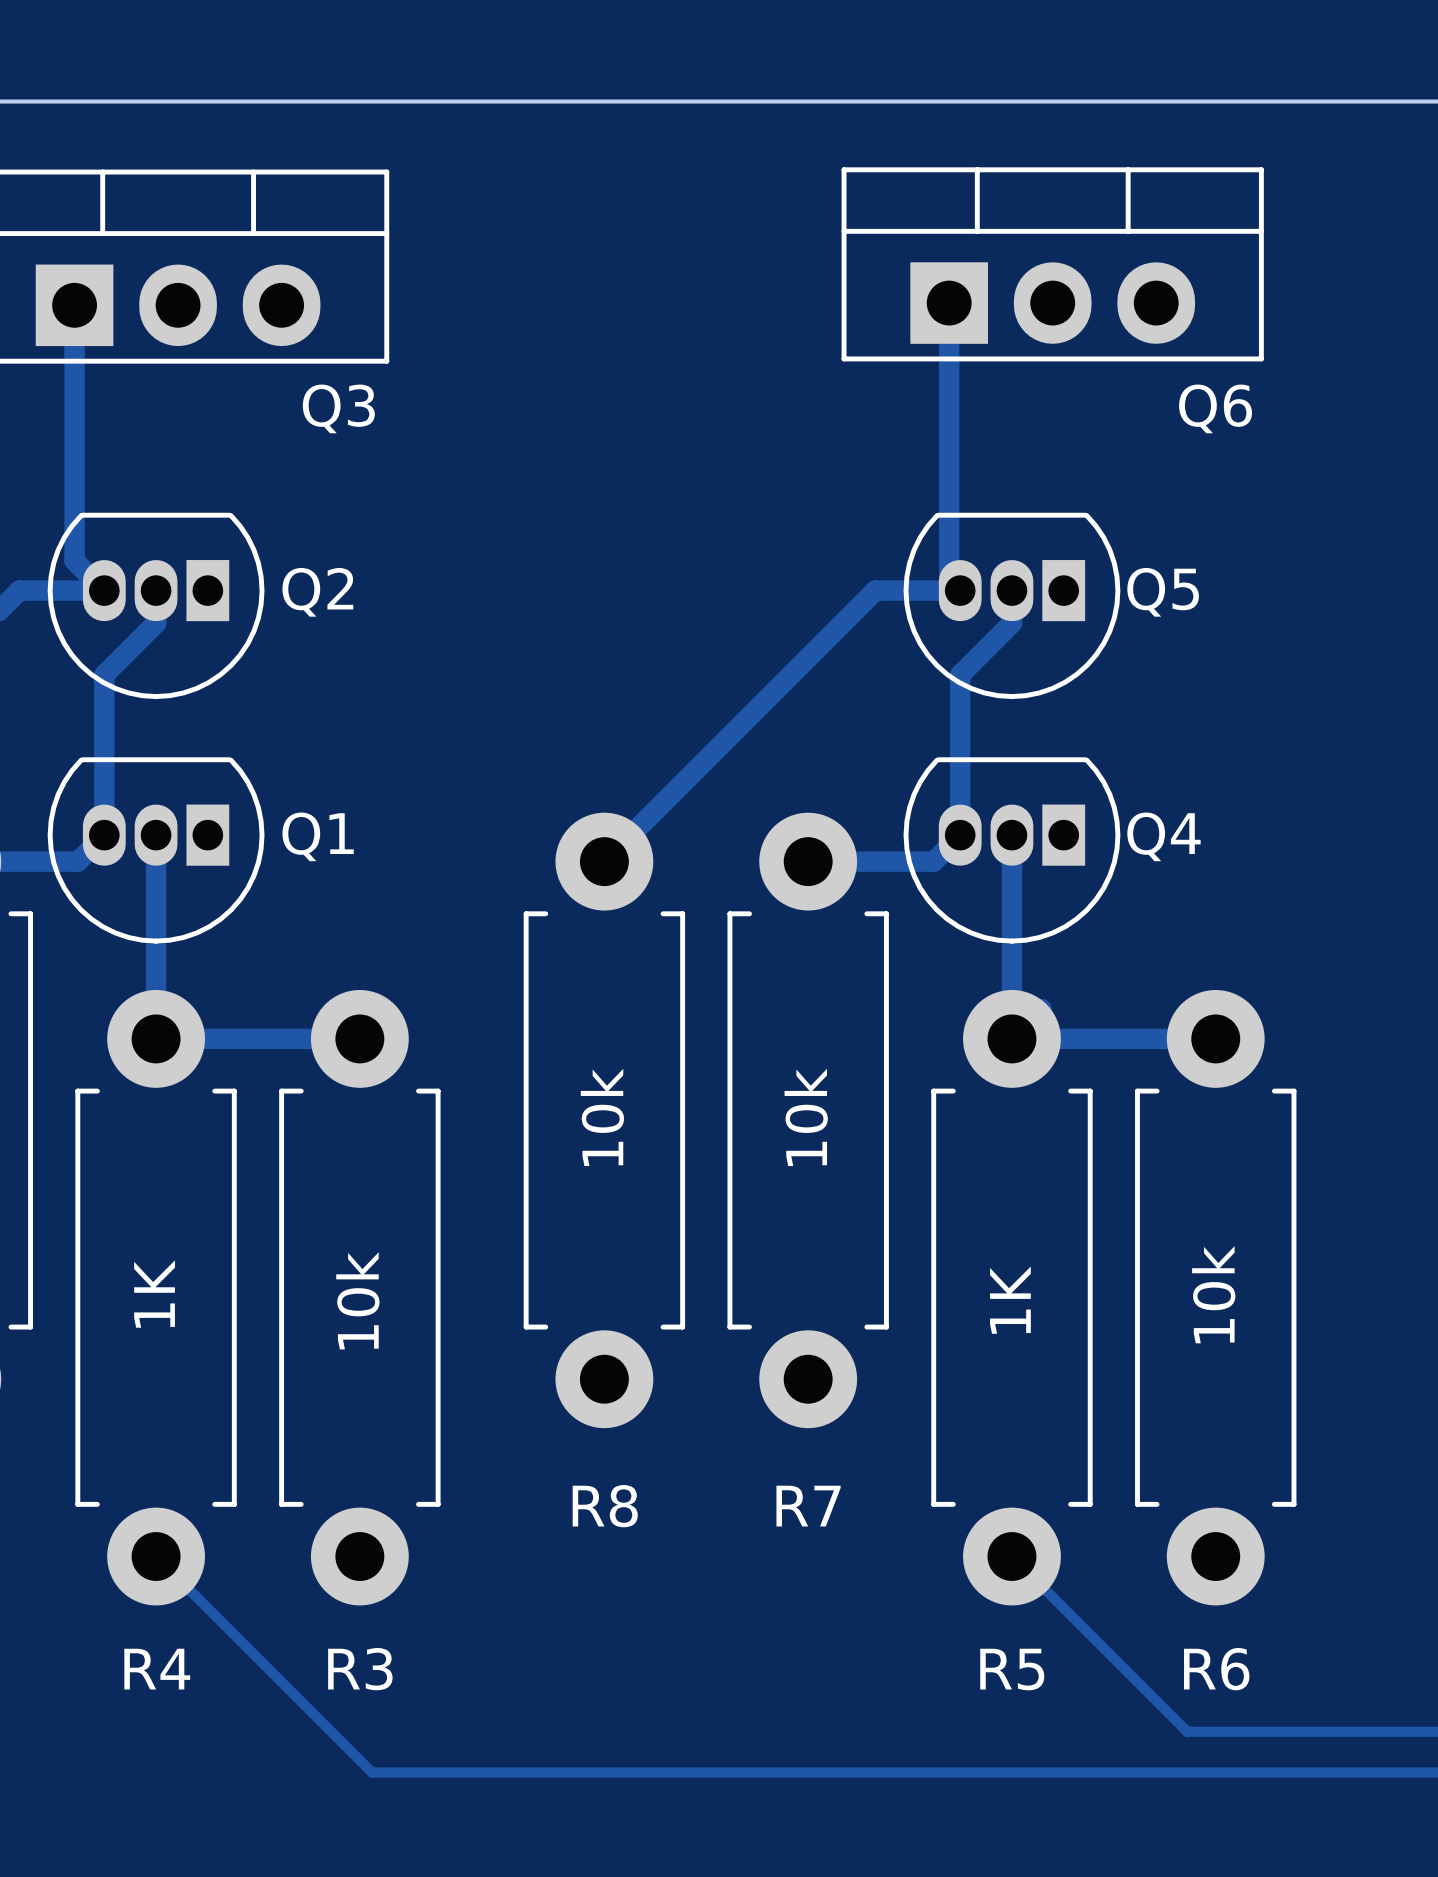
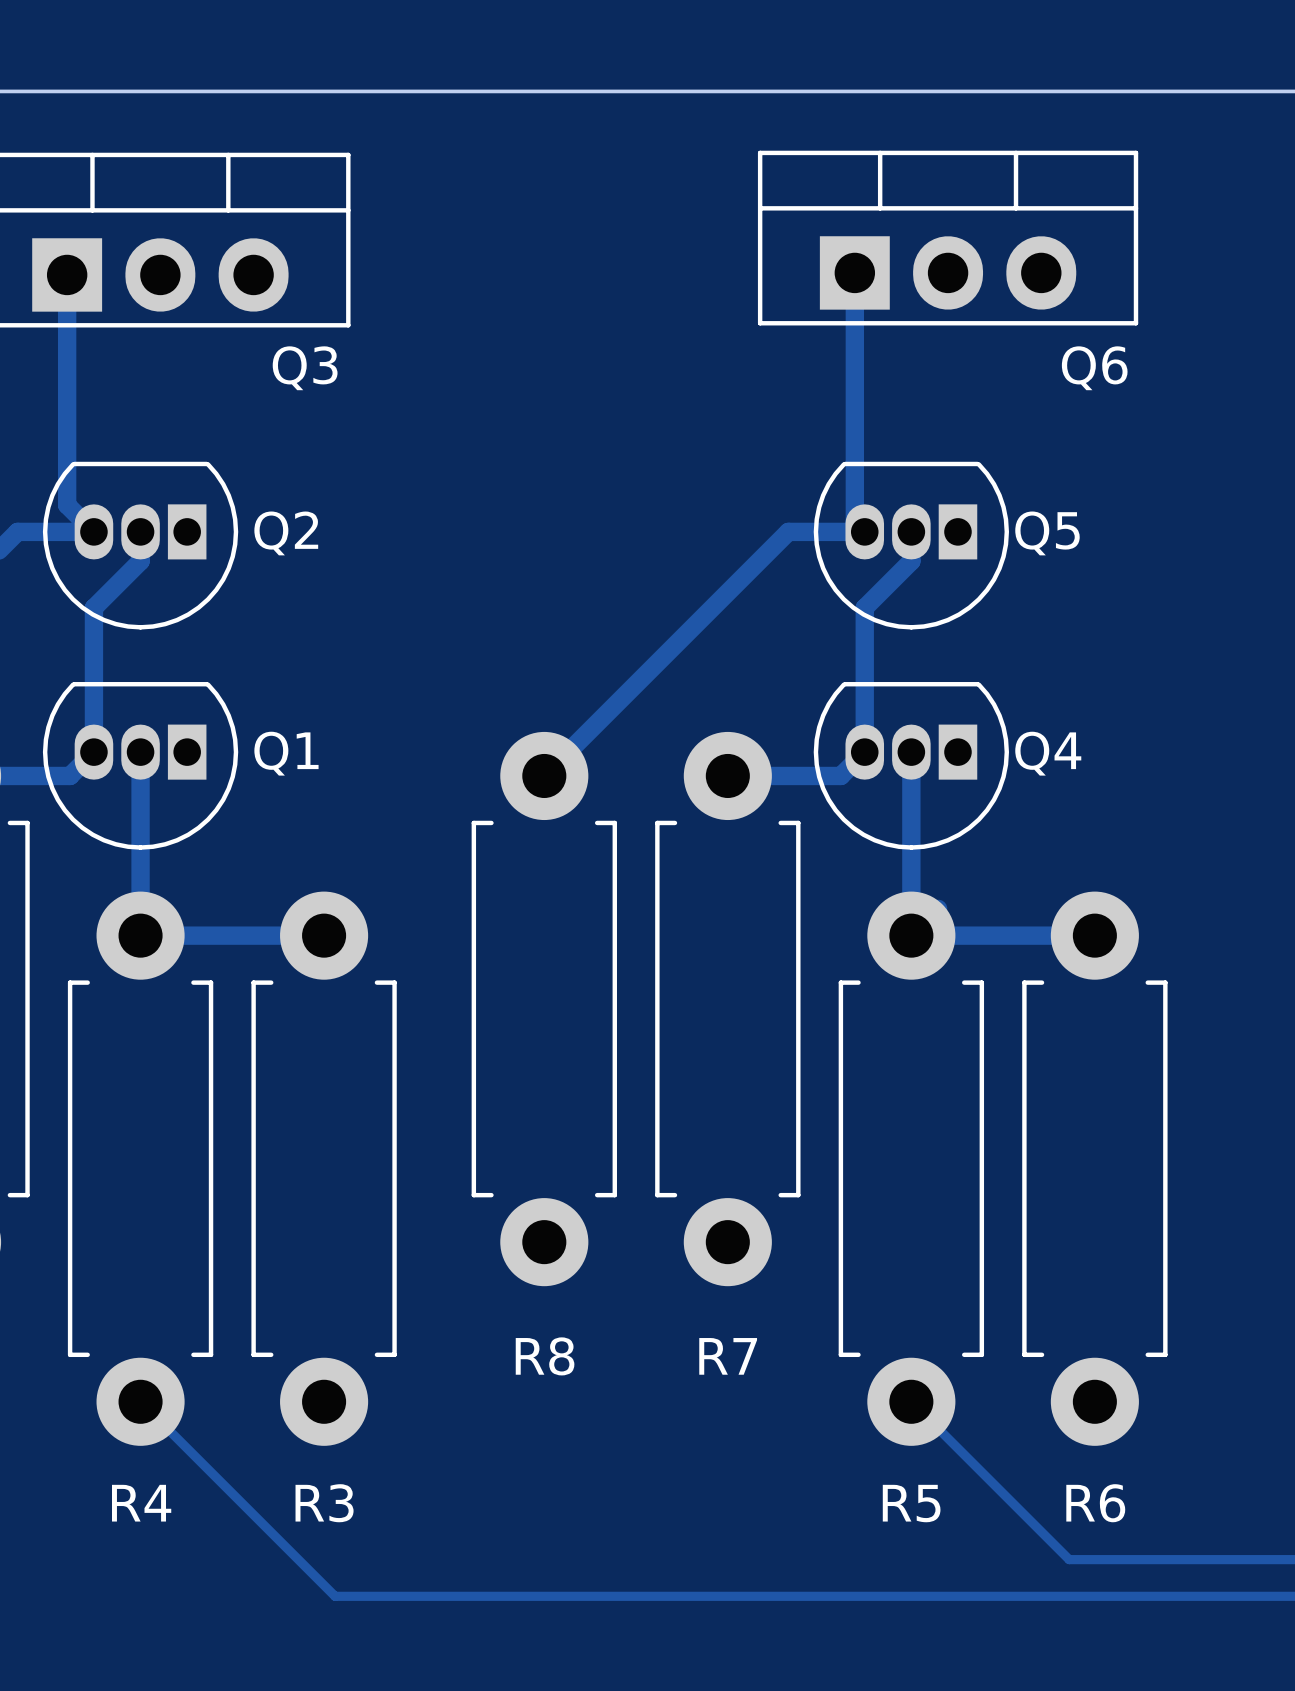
R8 value: 10k (602, 1117) -> none
R7 value: 10k (806, 1117) -> none
R4 value: 1K (154, 1294) -> none
R6 value: 10k (1213, 1294) -> none
R3 value: 10k (357, 1300) -> none
R5 value: 1K (1010, 1300) -> none

